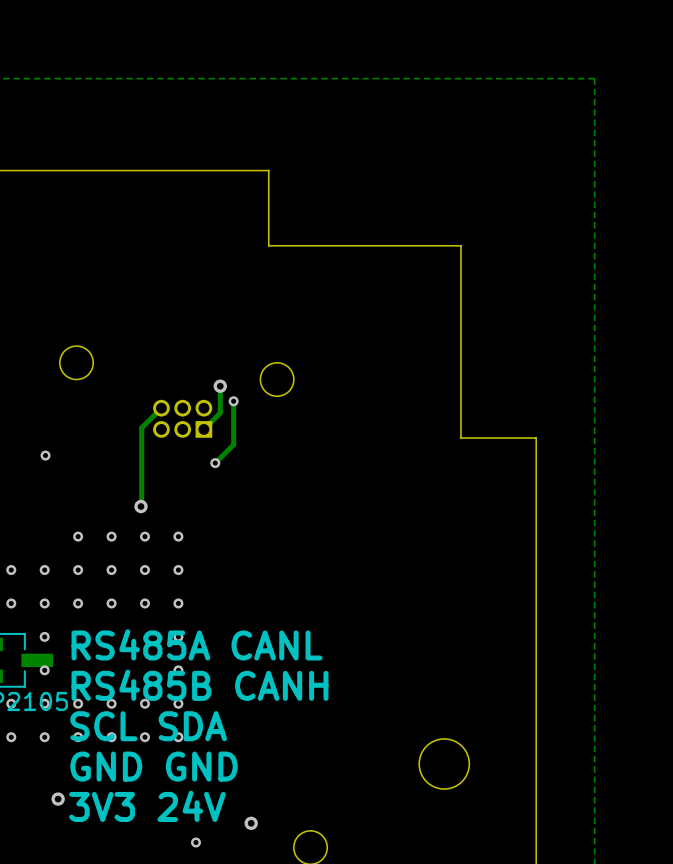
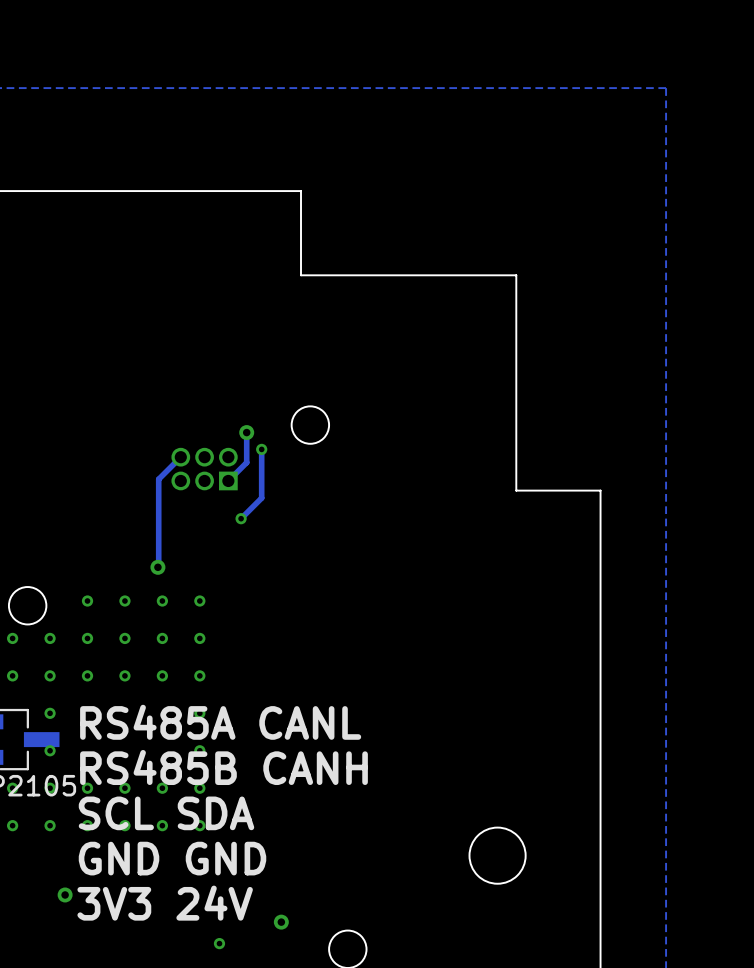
round board edge position: (76, 362) -> (27, 605)
via: (45, 455) -> none

